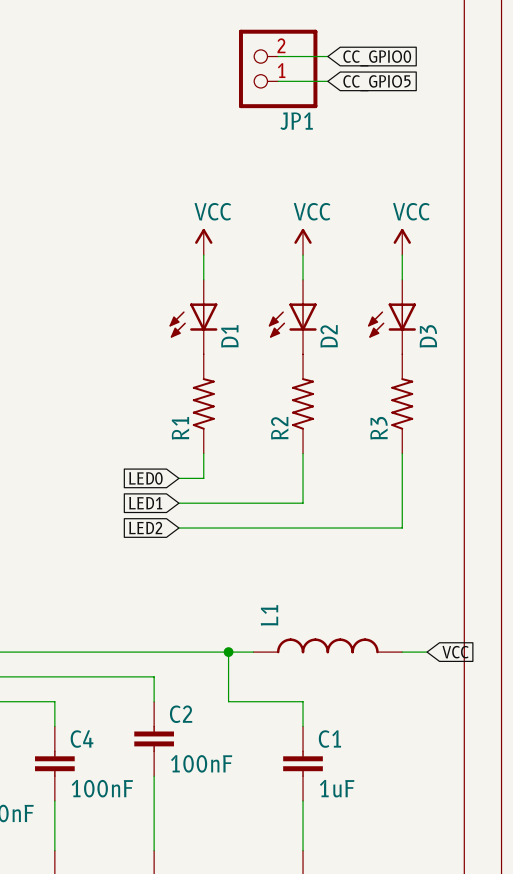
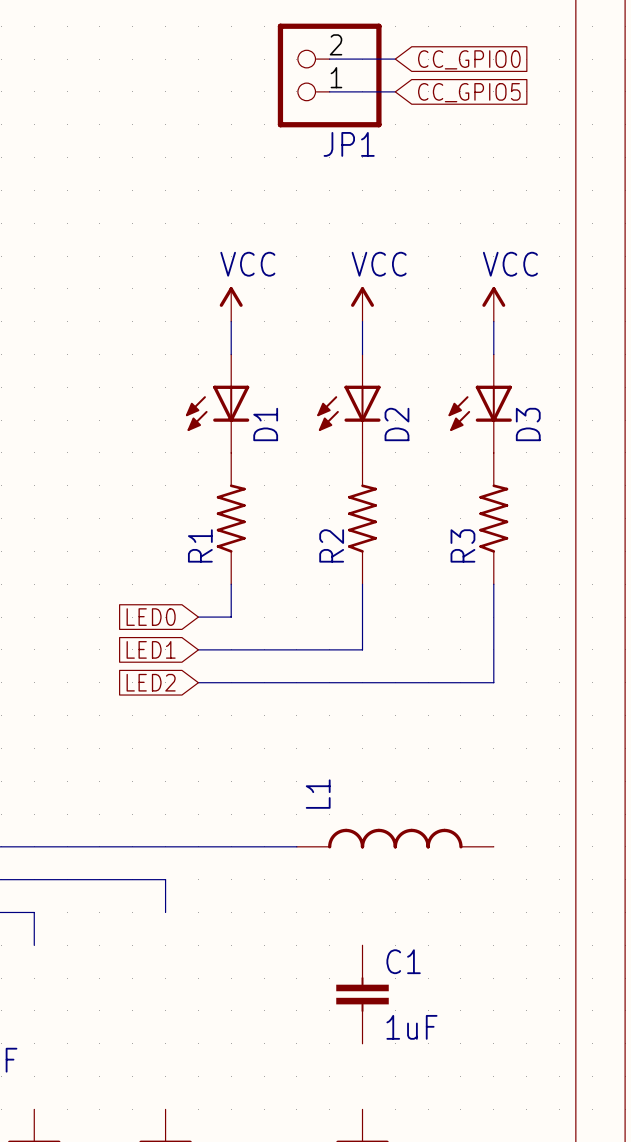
wire: (228, 652) (228, 701) (303, 701) (303, 726) -> none
junction: (228, 652) -> none
wire: (402, 652) (427, 652) -> none
global label: VCC (455, 652) -> none
C2: 100nF (154, 738) -> none
C4: 100nF (54, 763) -> none
wire: (154, 776) (154, 850) -> none
wire: (54, 800) (54, 850) -> none
wire: (303, 800) (303, 850) -> none

